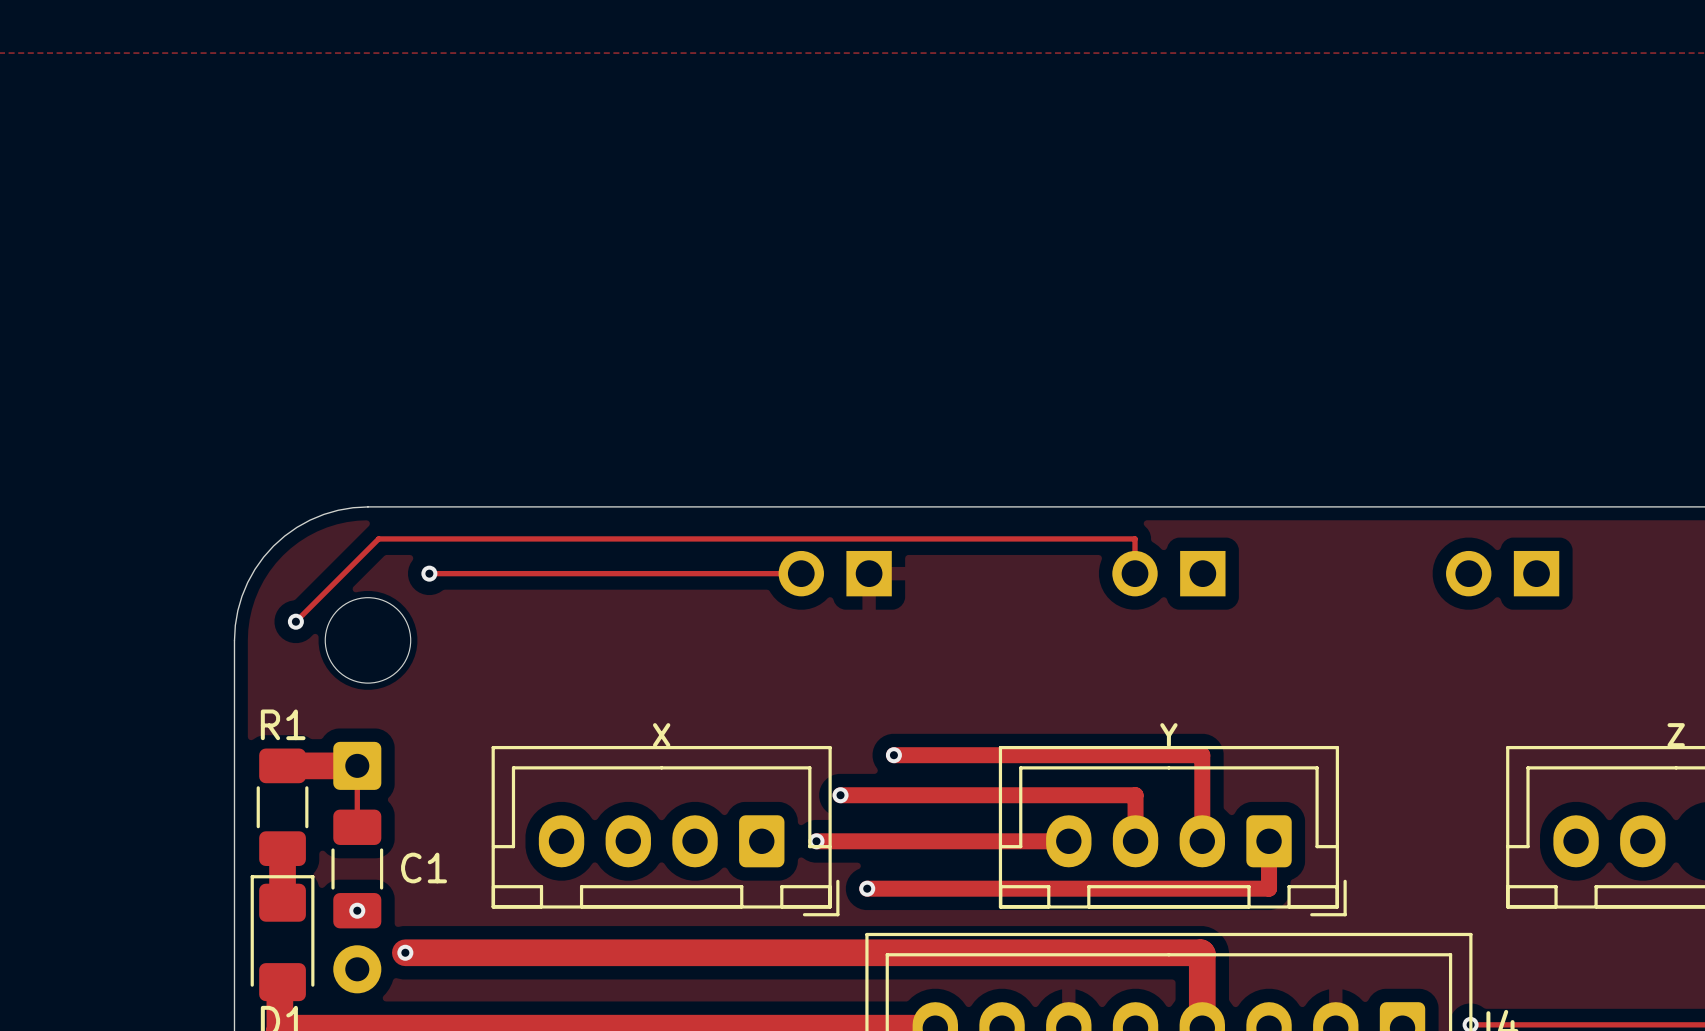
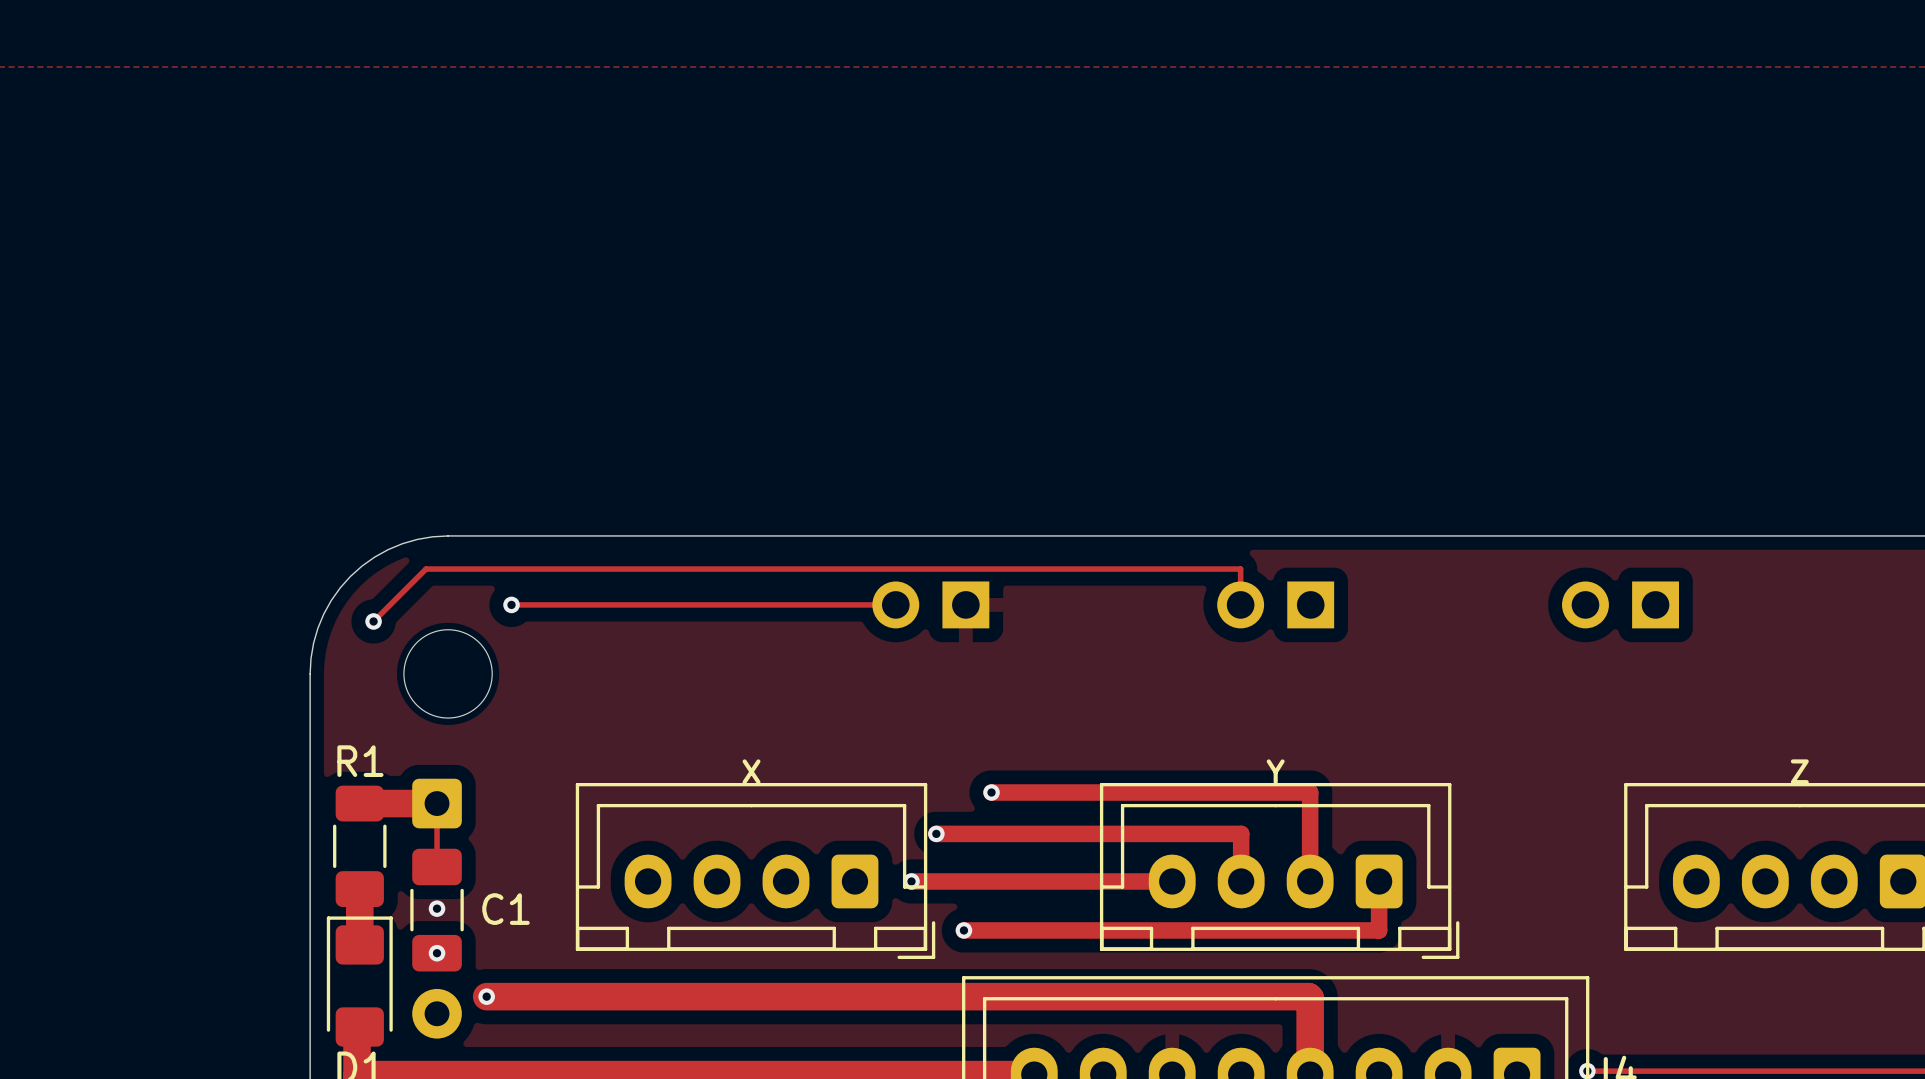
track: (378, 538) (295, 621) -> (459, 569) (425, 569) (373, 621)
via position: (295, 621) -> (373, 621)
via: none -> (437, 908)

